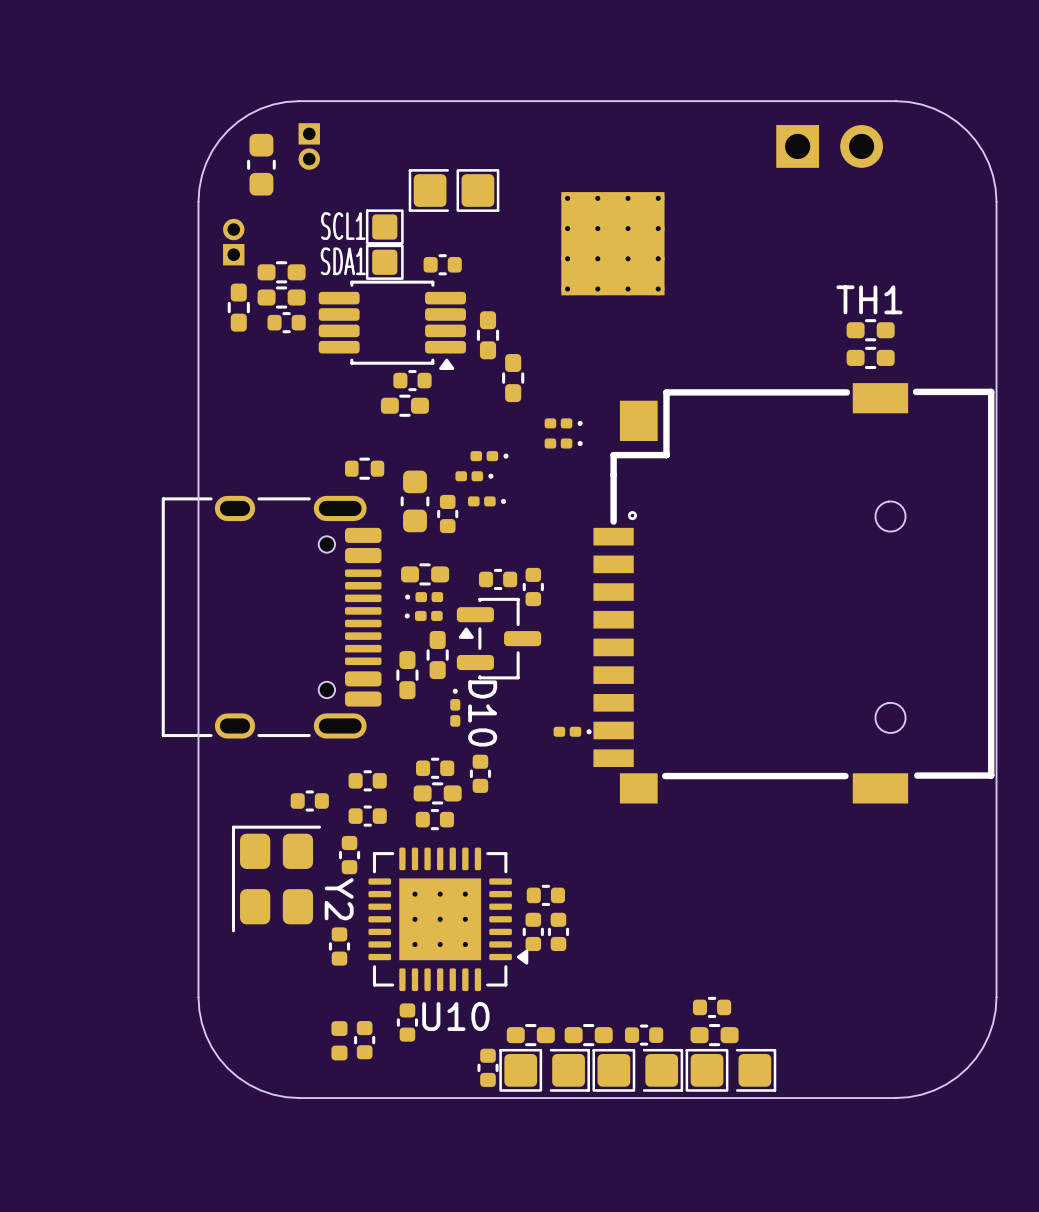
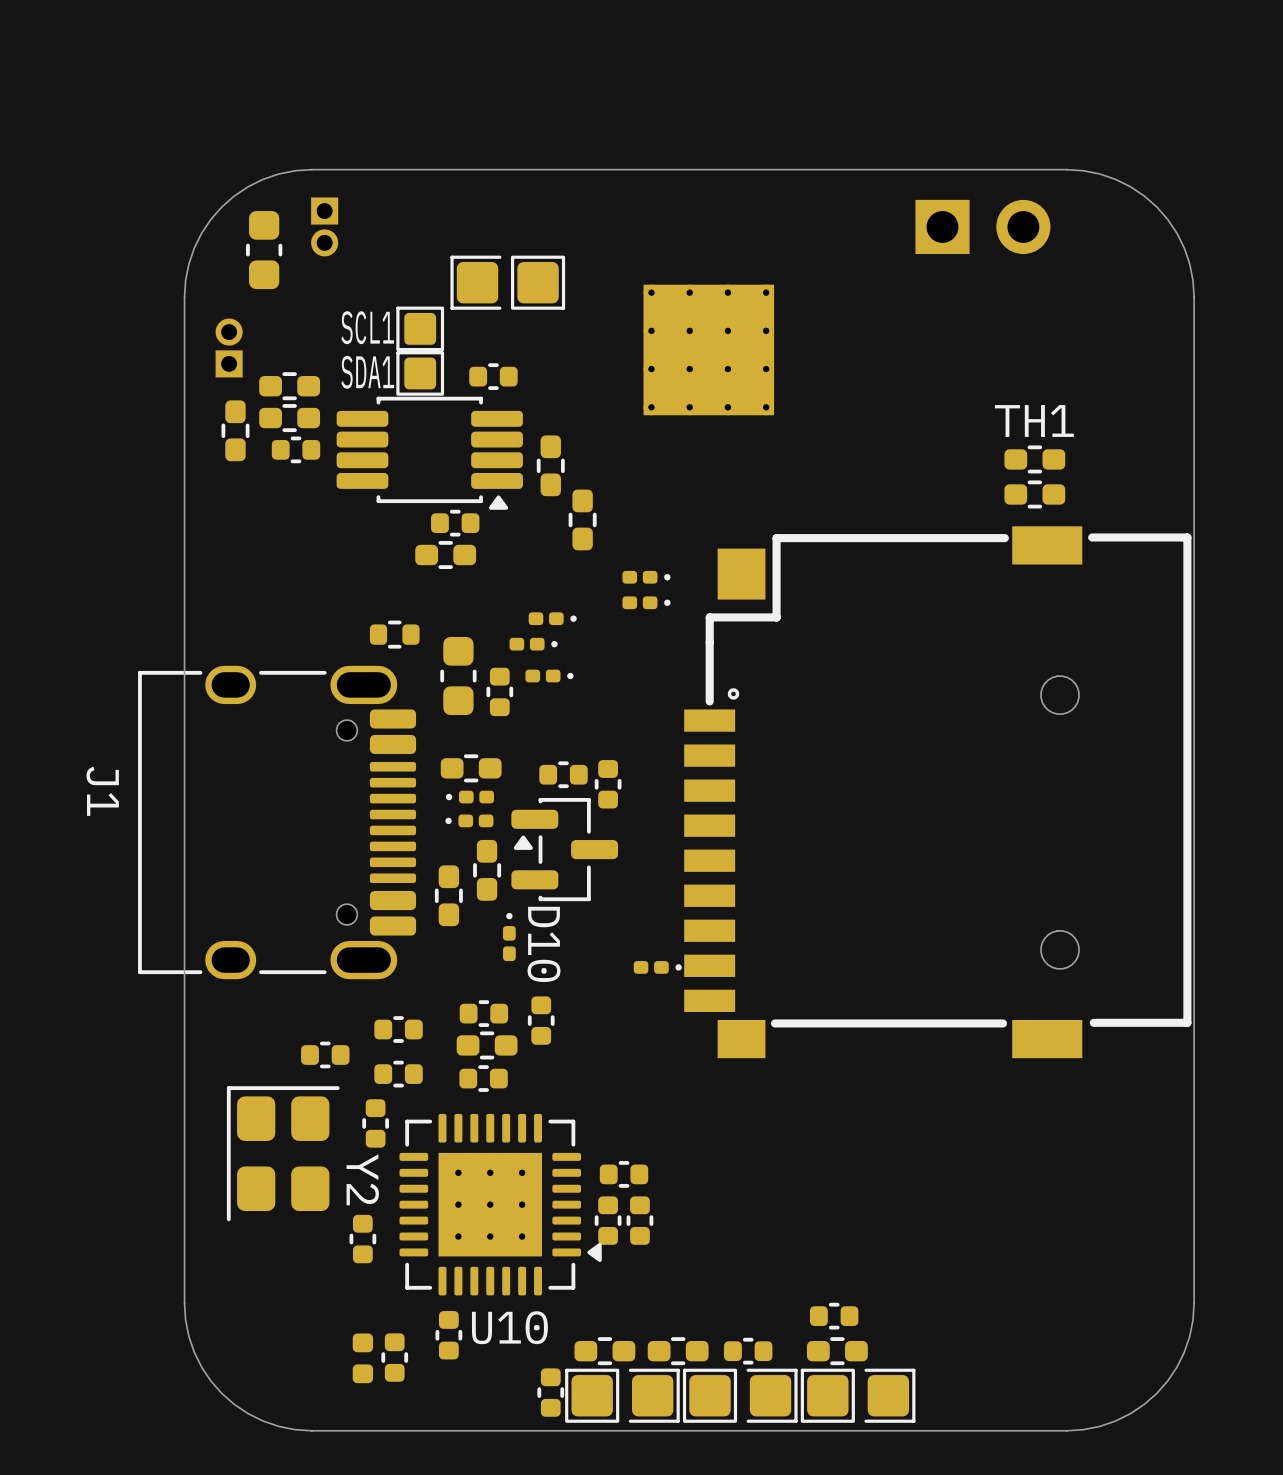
part: (271, 617) -> none
J1: none -> (277, 822)

